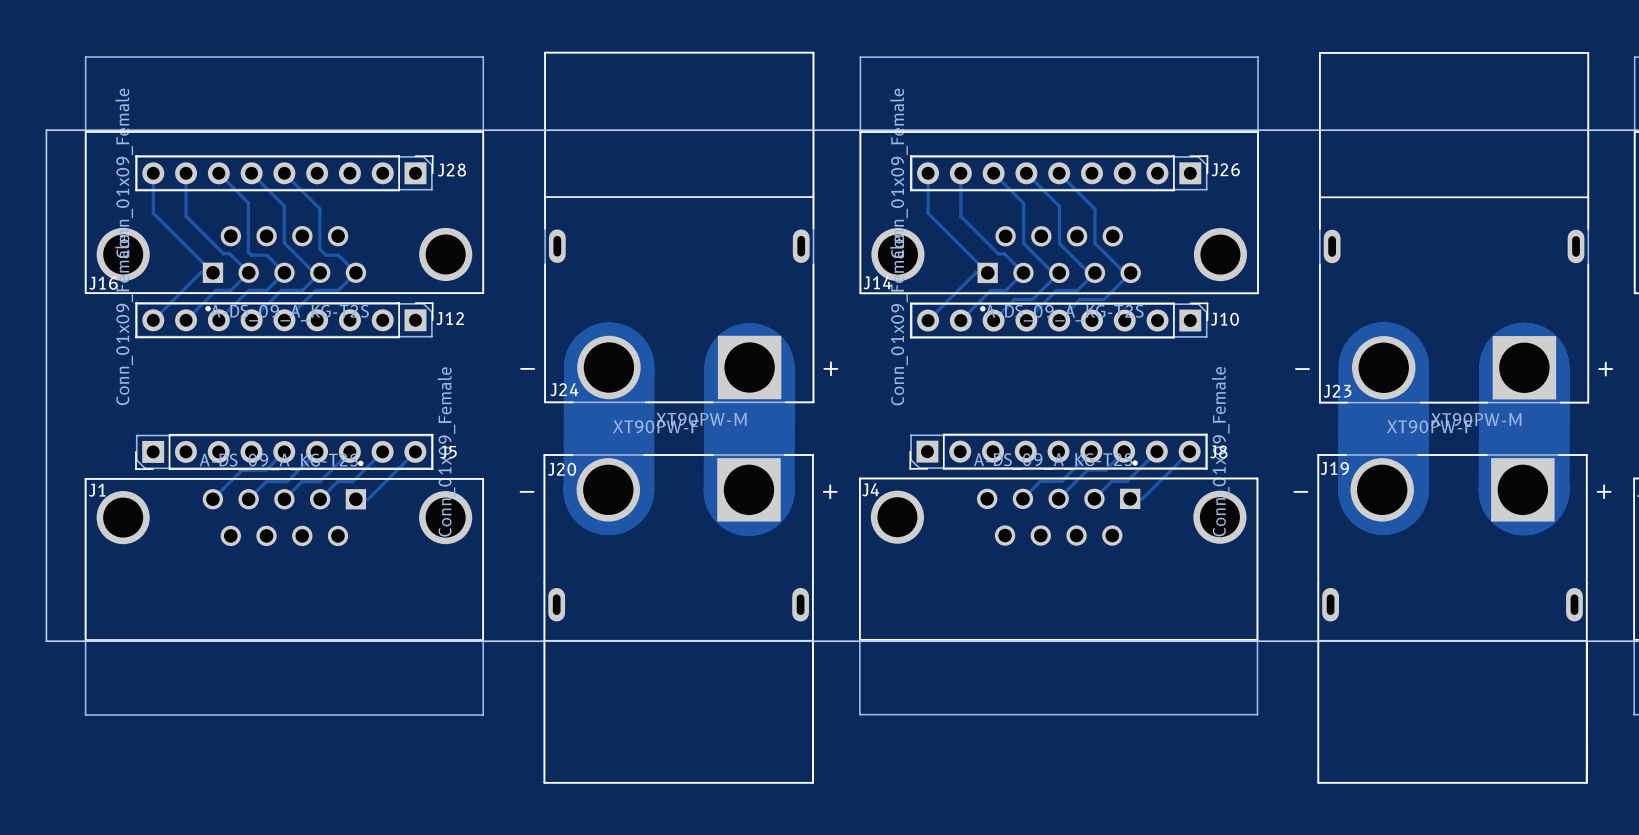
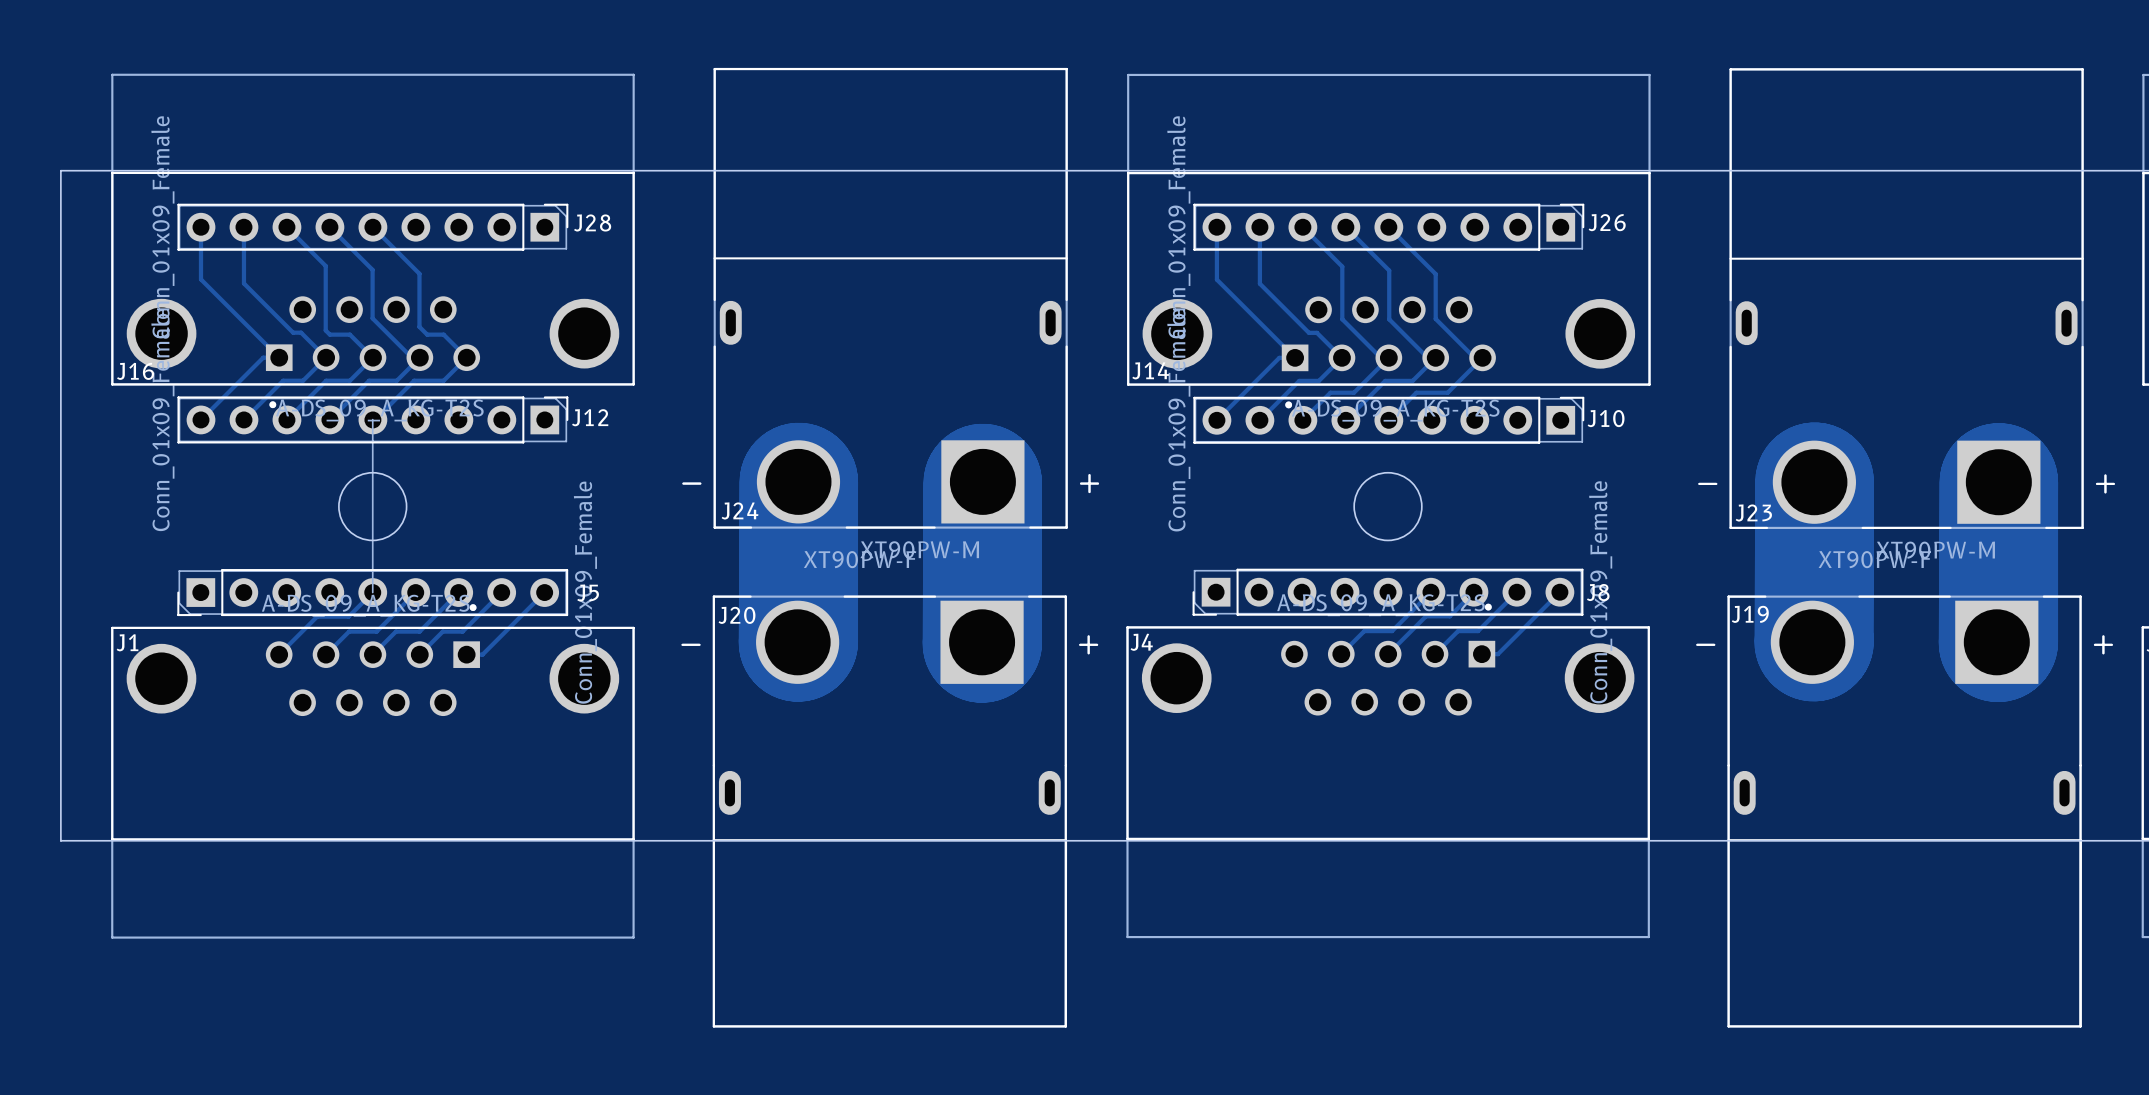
line: none -> (372, 419) (372, 592)
round board edge: none -> [338, 471, 408, 542]
round board edge: none -> [1353, 471, 1423, 542]

